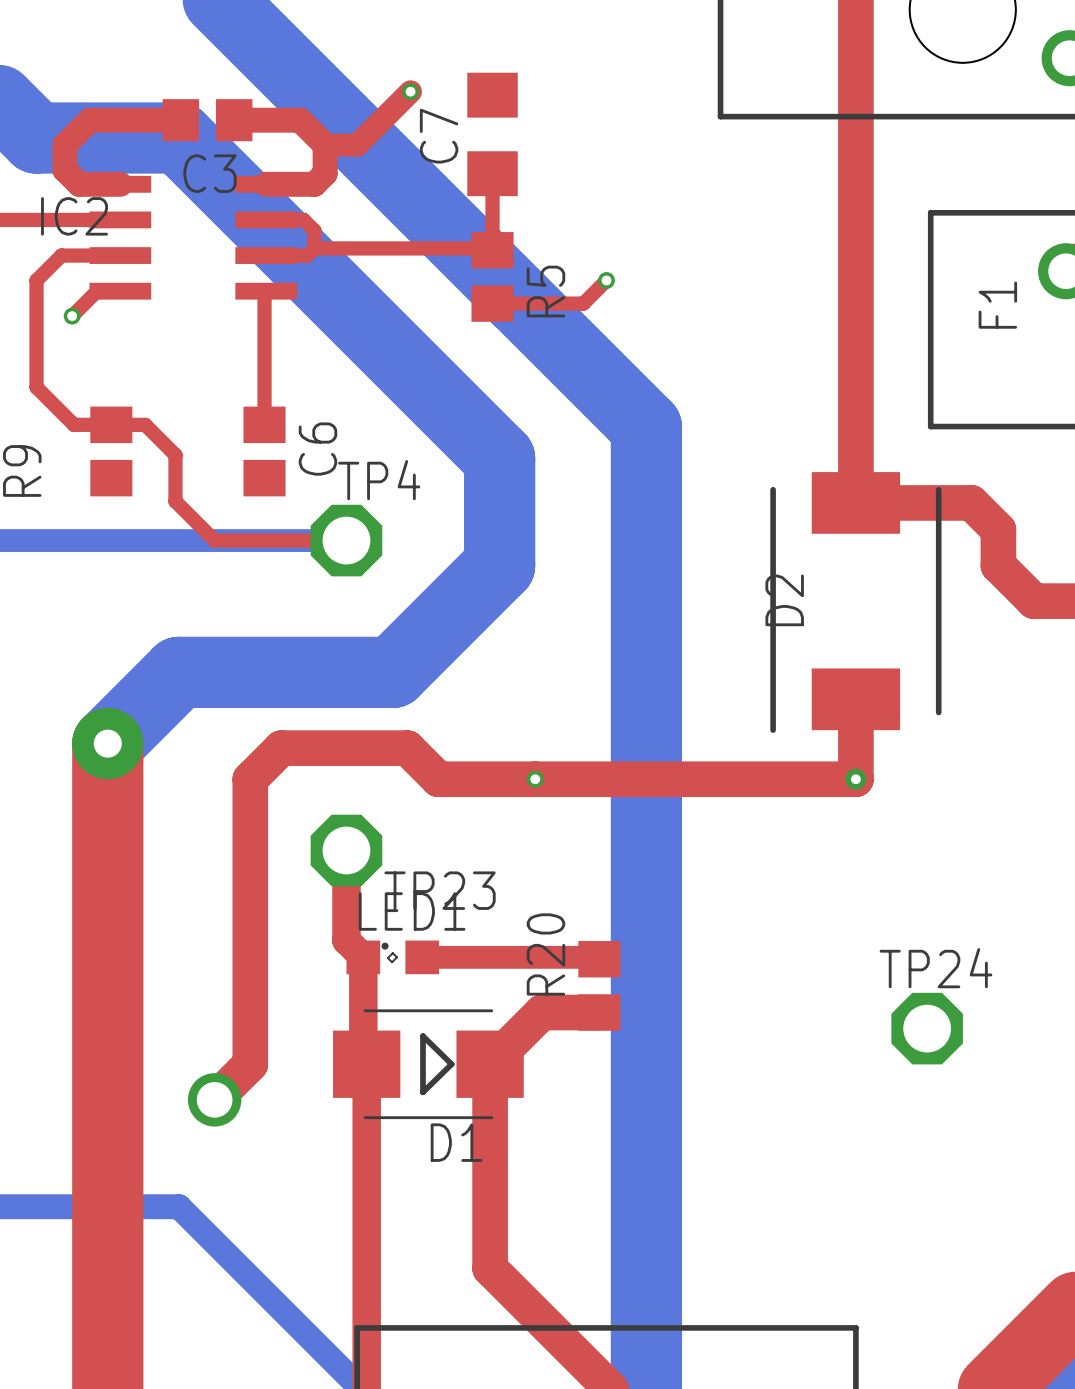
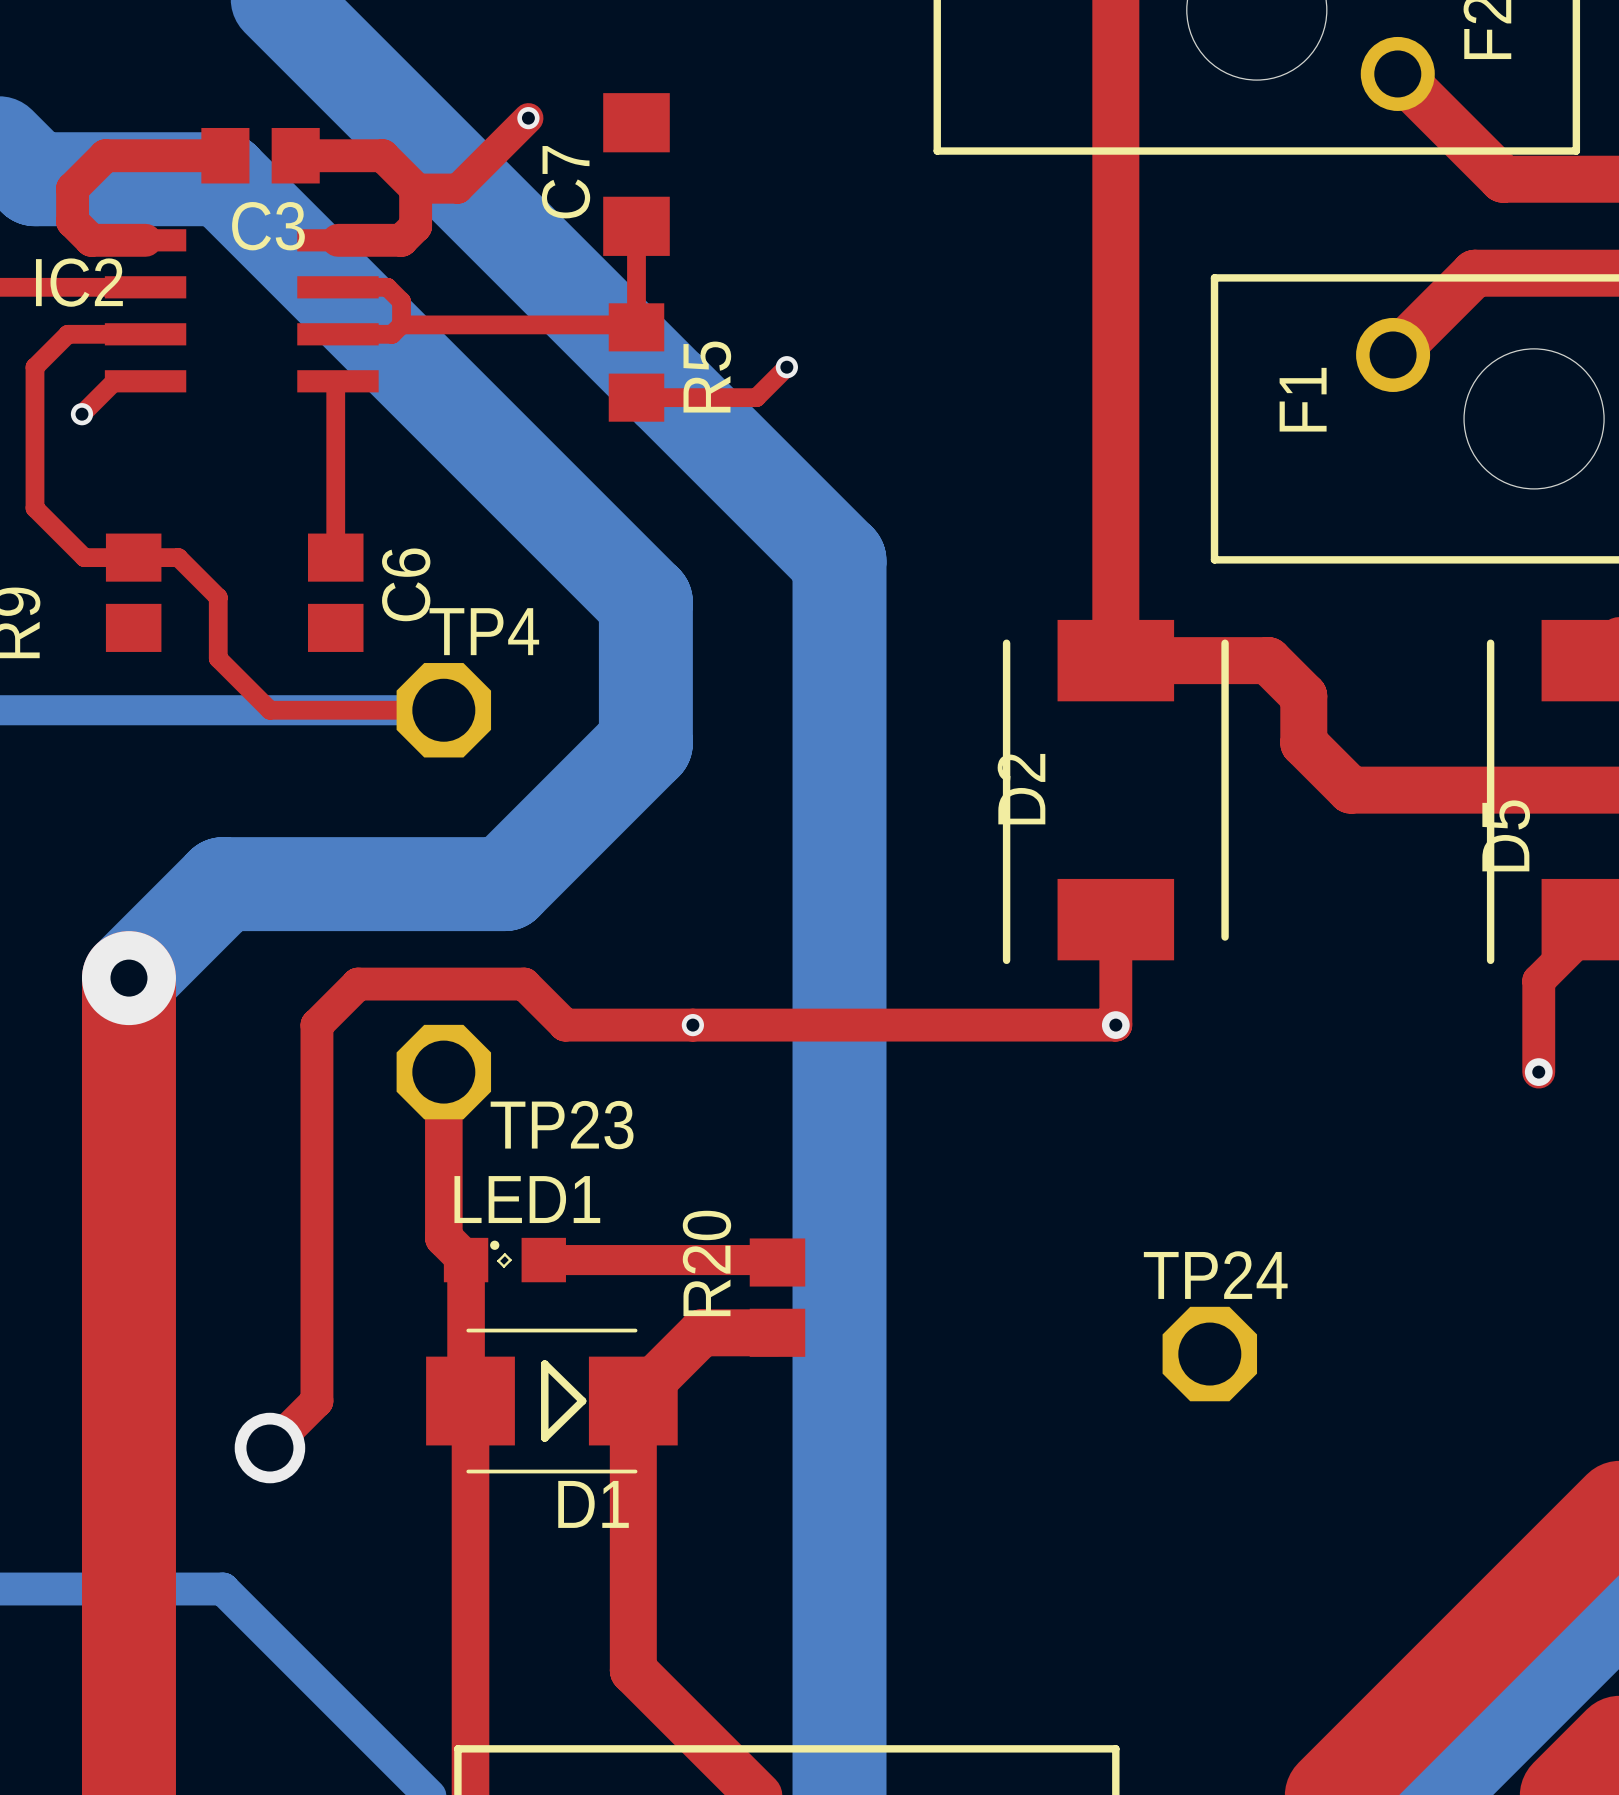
top track width: thick (855, 699) (855, 779) (438, 779) (407, 748) (281, 748) (250, 779) (250, 1064) (214, 1099) -> thin (1115, 919) (1115, 1025) (565, 1025) (524, 984) (357, 984) (316, 1025) (316, 1401) (269, 1448)
TP23 position: (346, 850) -> (443, 1072)

